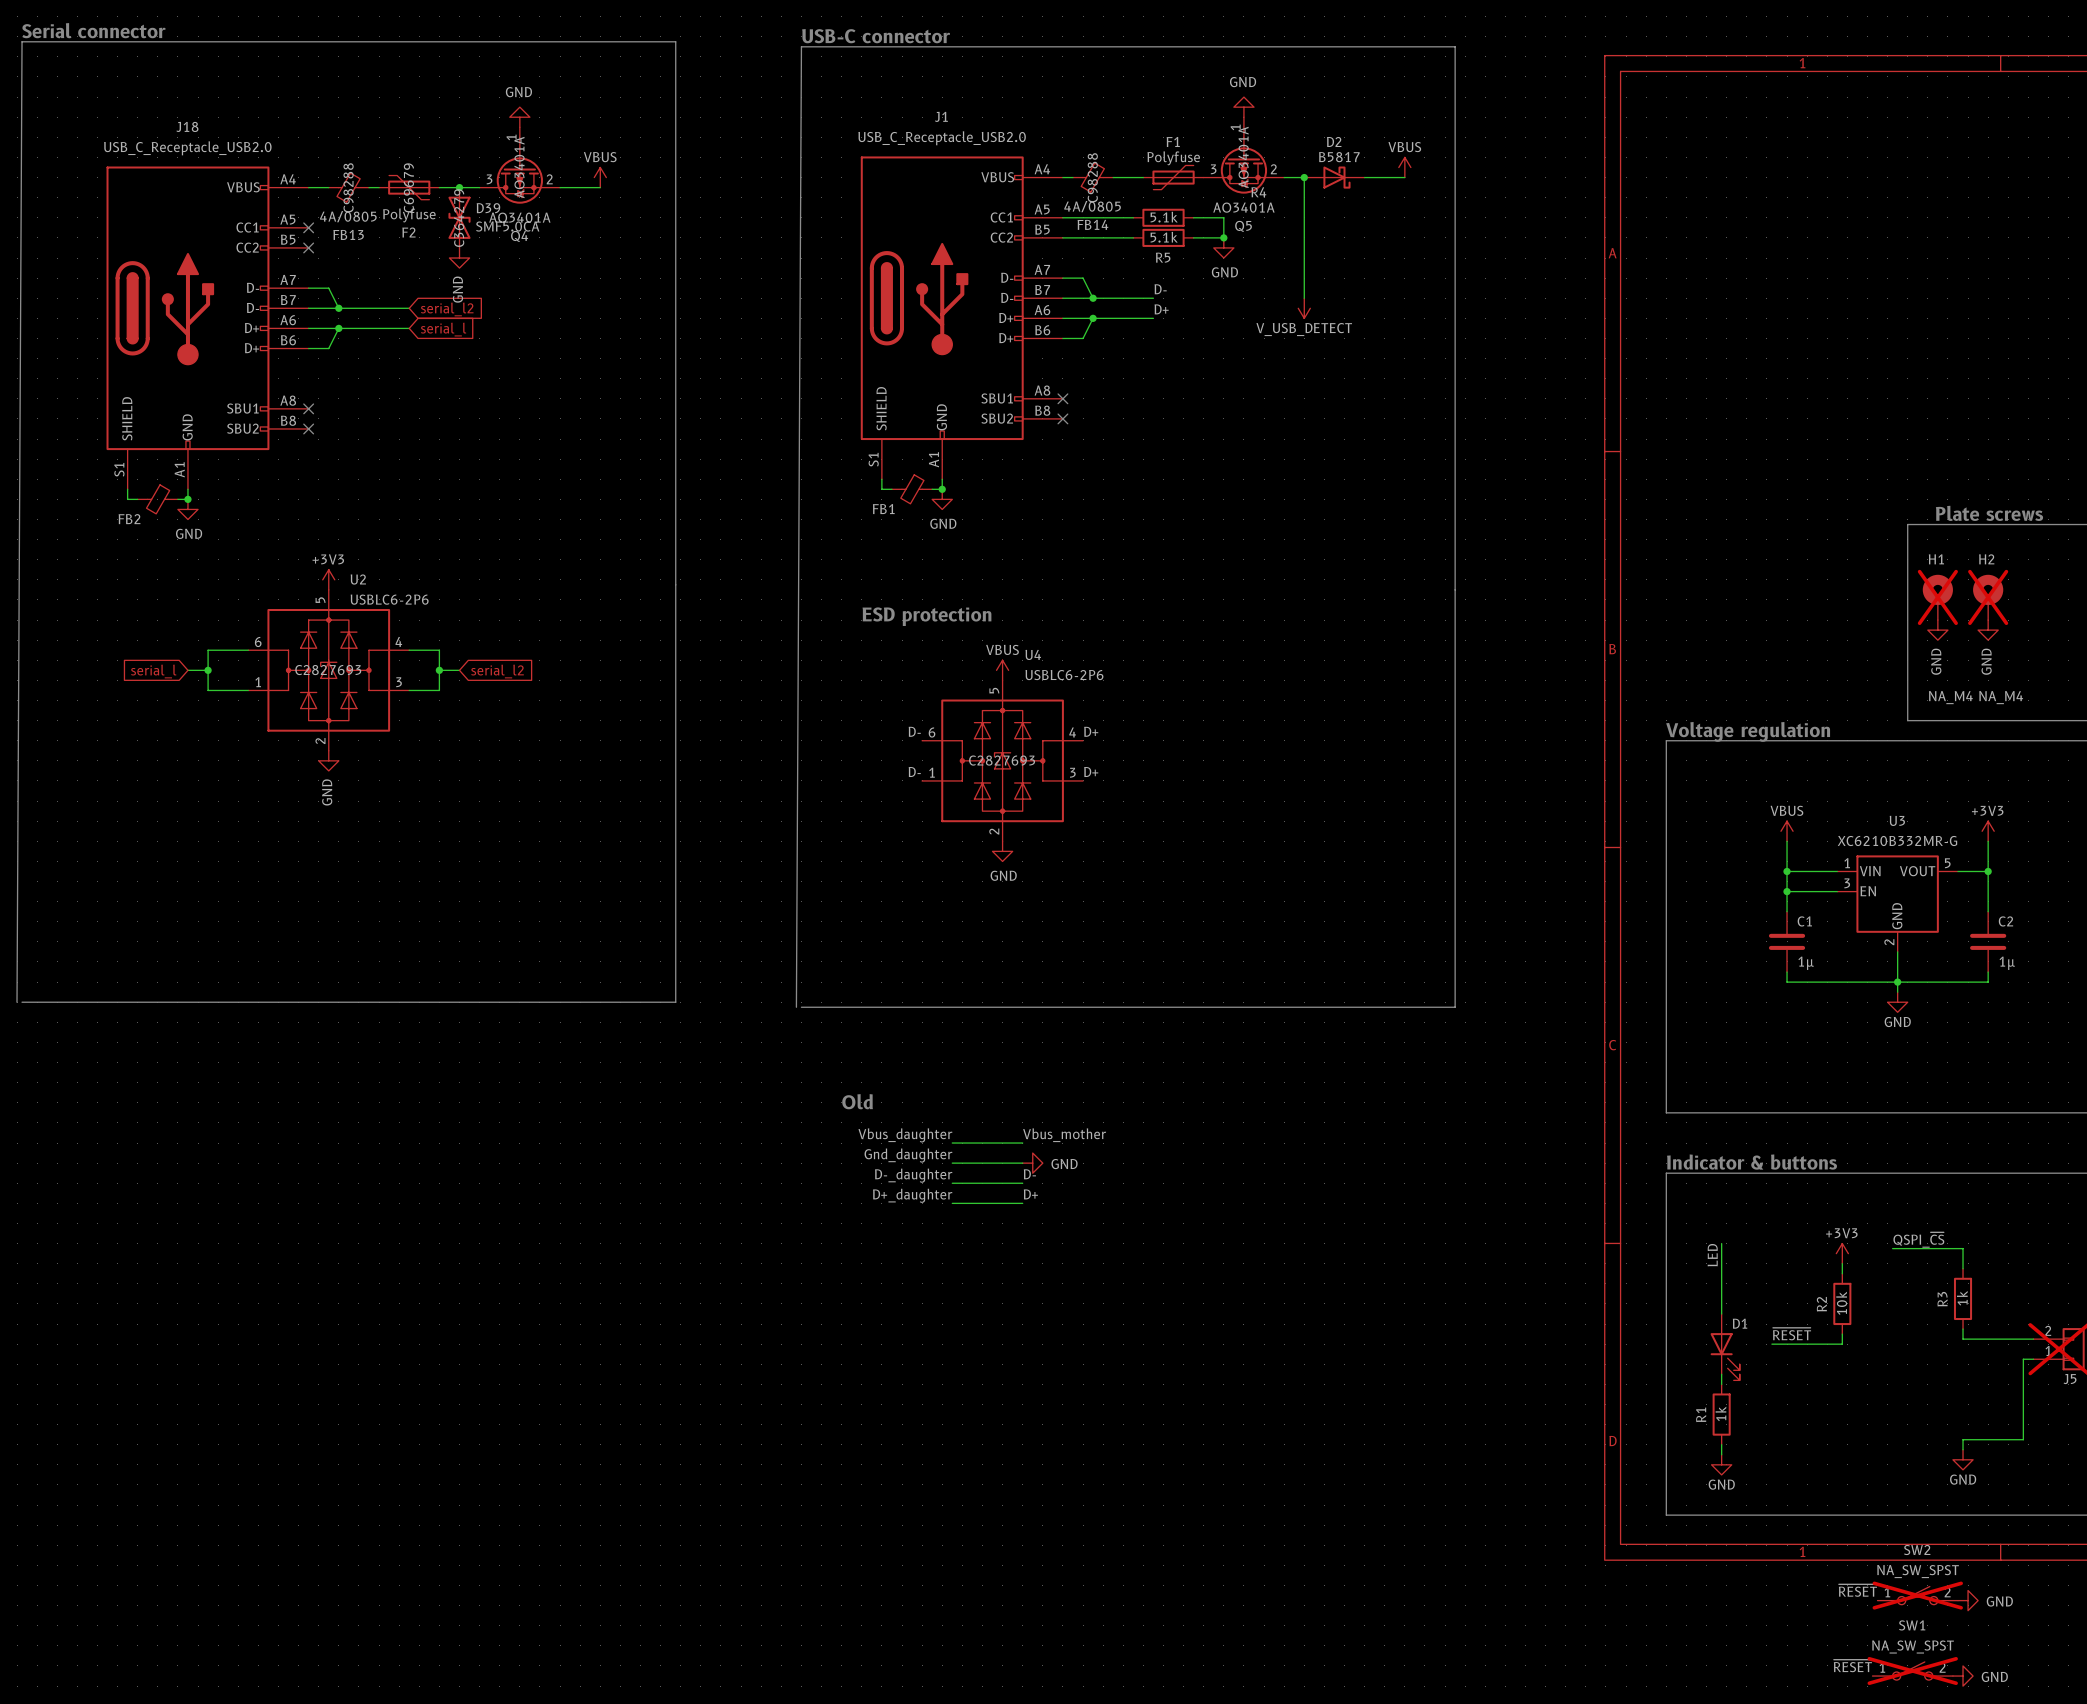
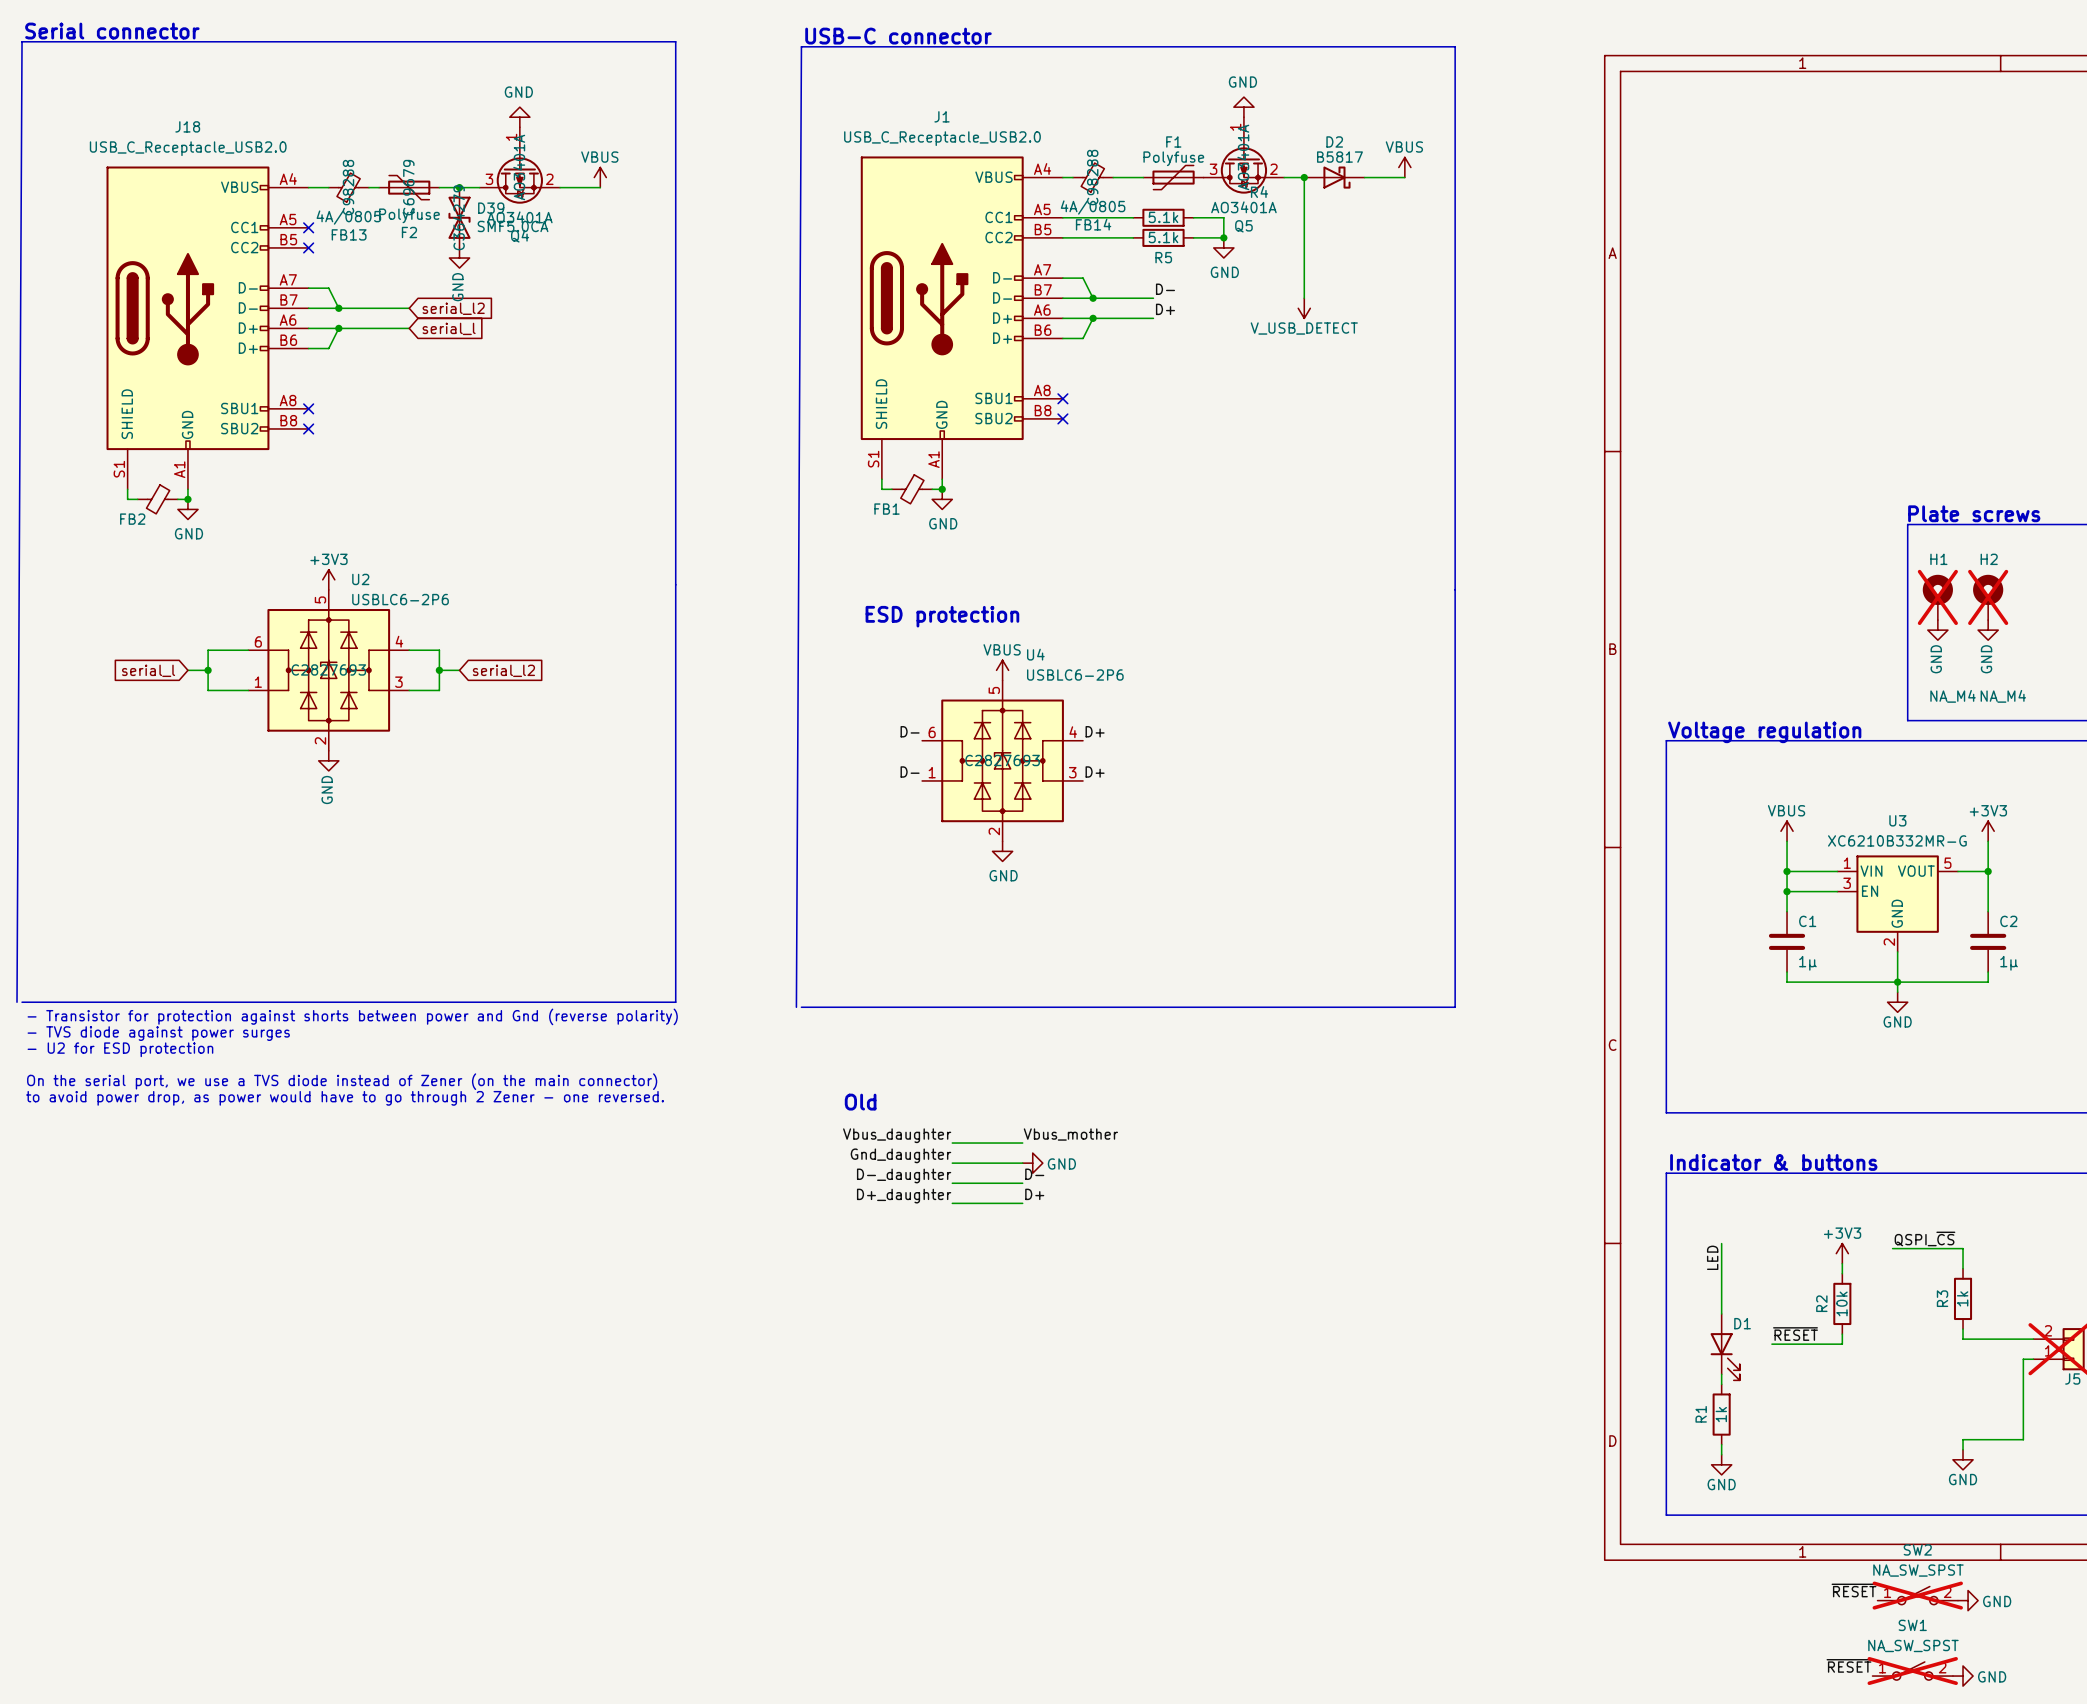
text: none -> - Transistor for protection against shorts between power and Gnd (reverse polarity) (352, 1016)
text: none -> - TVS diode against power surges (158, 1033)
text: none -> - U2 for ESD protection (120, 1049)
text: none -> On the serial port, we use a TVS diode instead of Zener (on the main connector) (342, 1081)
text: none -> to avoid power drop, as power would have to go through 2 Zener - one reversed. (345, 1098)

